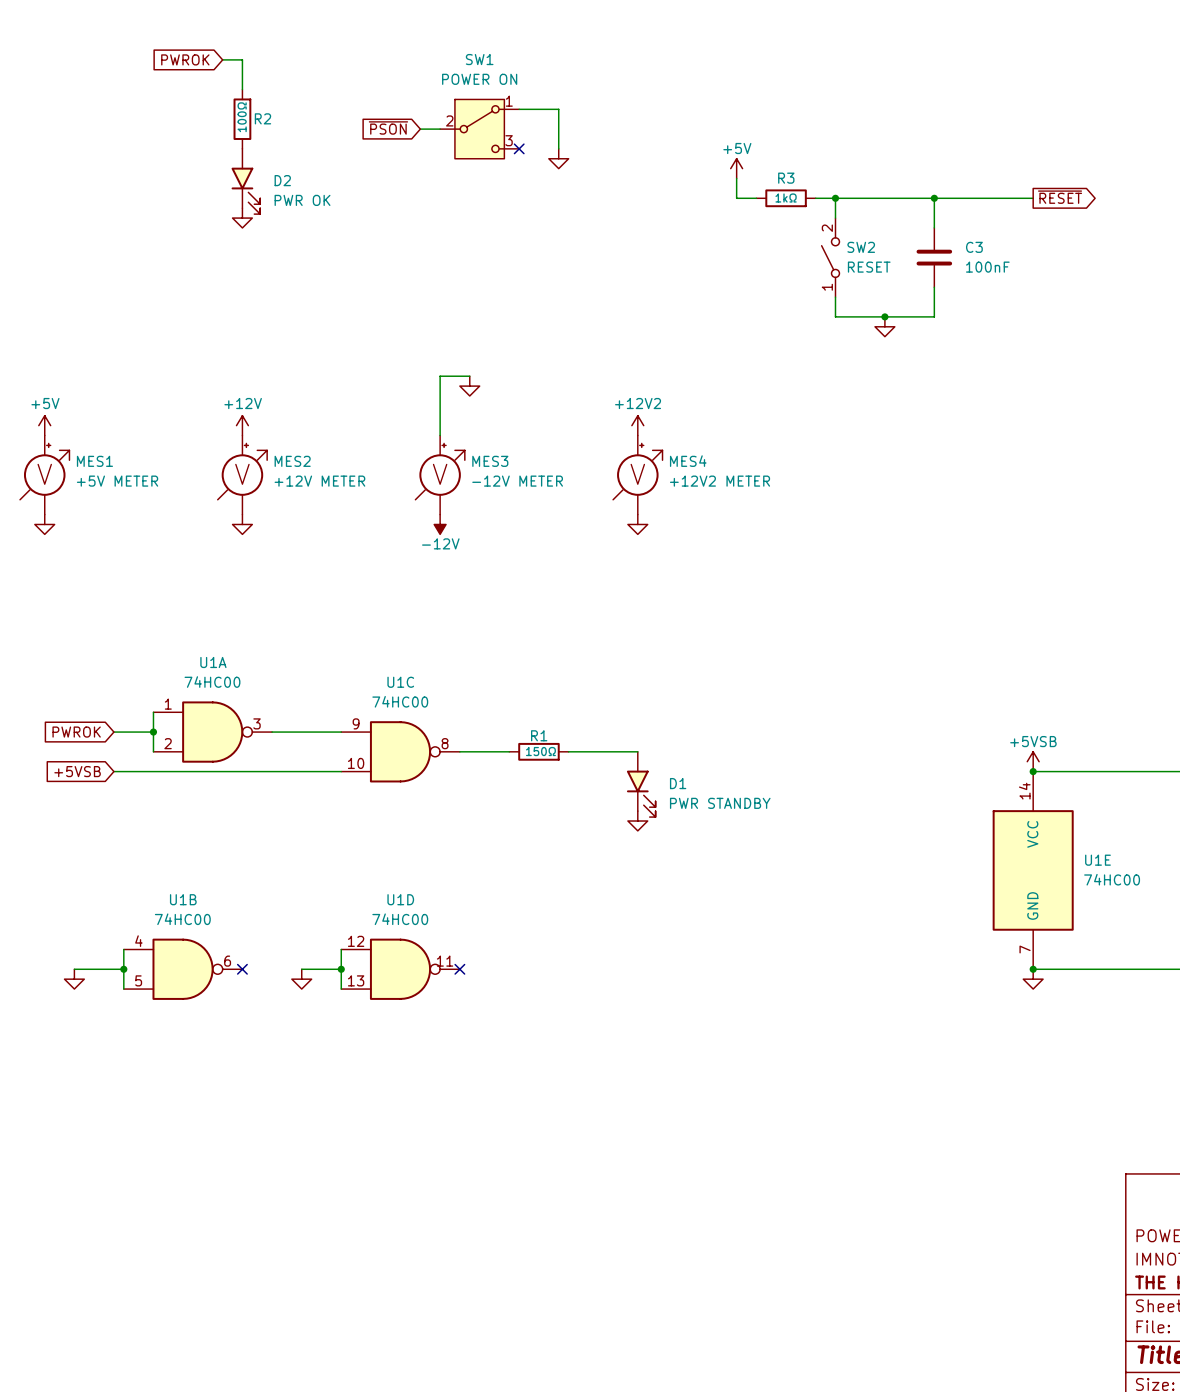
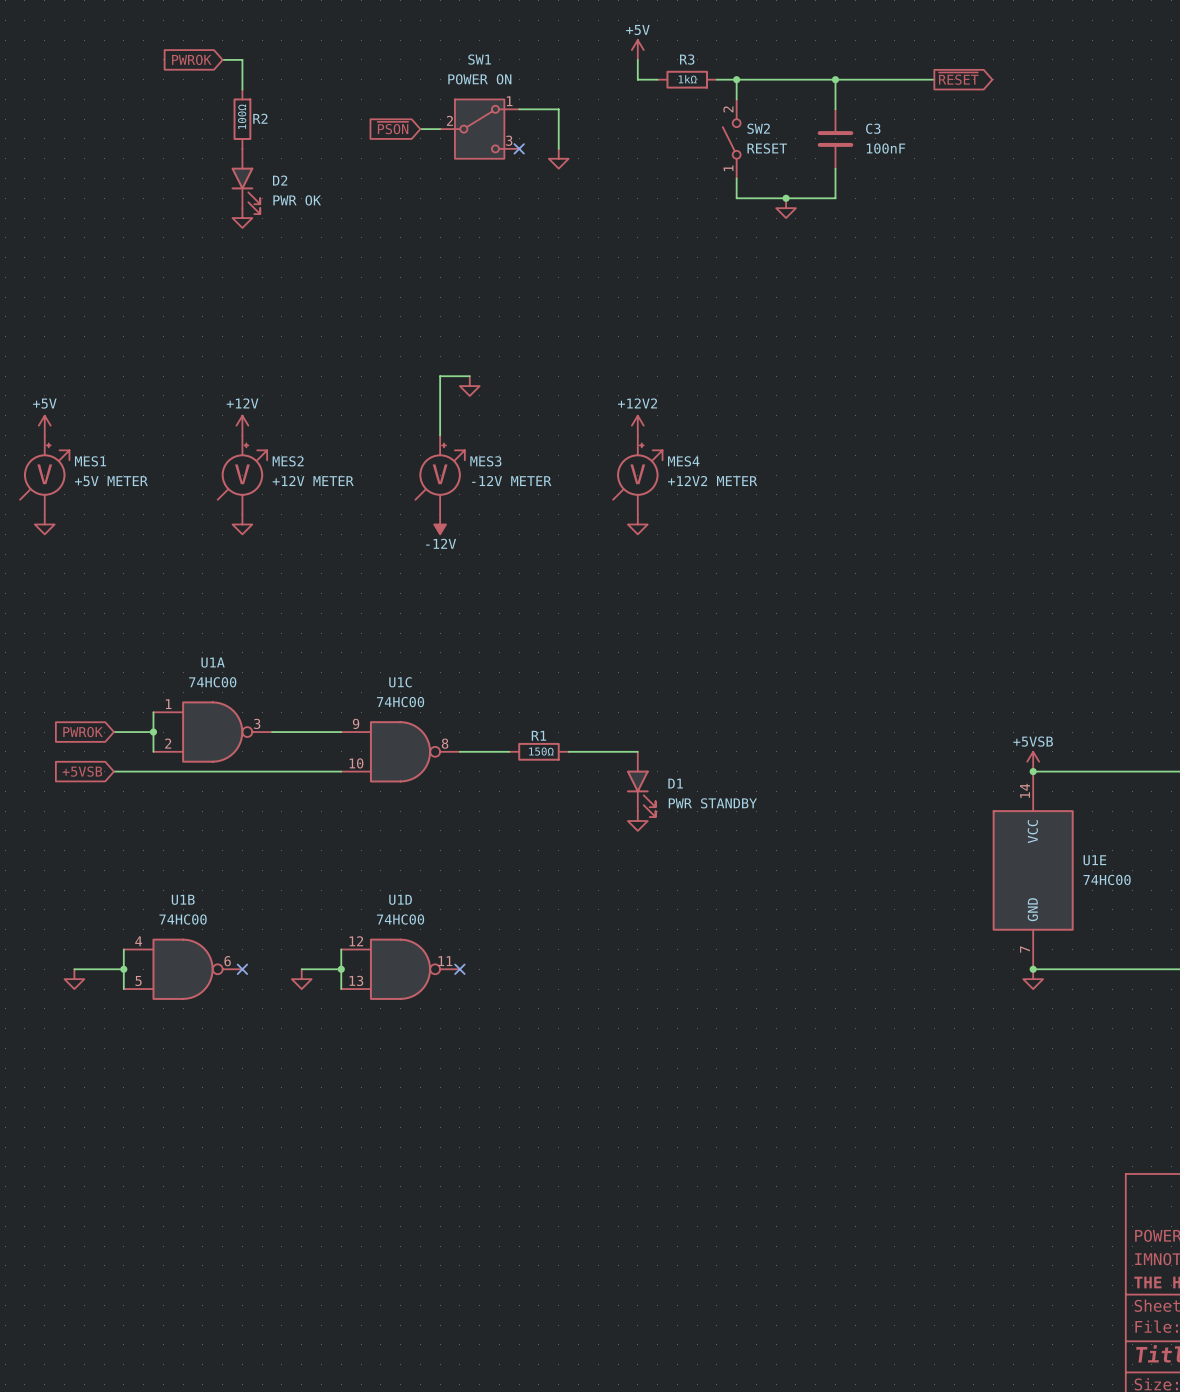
wire: none -> (637, 59) (637, 79) (657, 79)
wire: none -> (716, 79) (934, 79)
wire: none -> (736, 79) (736, 99)
junction: none -> (736, 79)
wire: none -> (835, 79) (835, 109)
junction: none -> (835, 79)
power symbol position: +5V (736, 168) -> +5V (637, 50)
global label position: ~{RESET} (1060, 197) -> ~{RESET} (958, 78)
wire: none -> (756, 198) (815, 198)
junction: none -> (786, 198)
R3 position: (786, 198) -> (687, 79)
junction: (835, 198) -> none
wire: (934, 198) (934, 227) -> (835, 168) (835, 198)
junction: (934, 198) -> none
wire: (1033, 198) (835, 198) (835, 218) -> none
SW2 position: (830, 257) -> (731, 138)
C3 position: (934, 257) -> (835, 138)
wire: (934, 287) (934, 316) (835, 316) (835, 297) -> none
junction: (884, 316) -> none
power symbol position: (884, 326) -> (786, 208)

